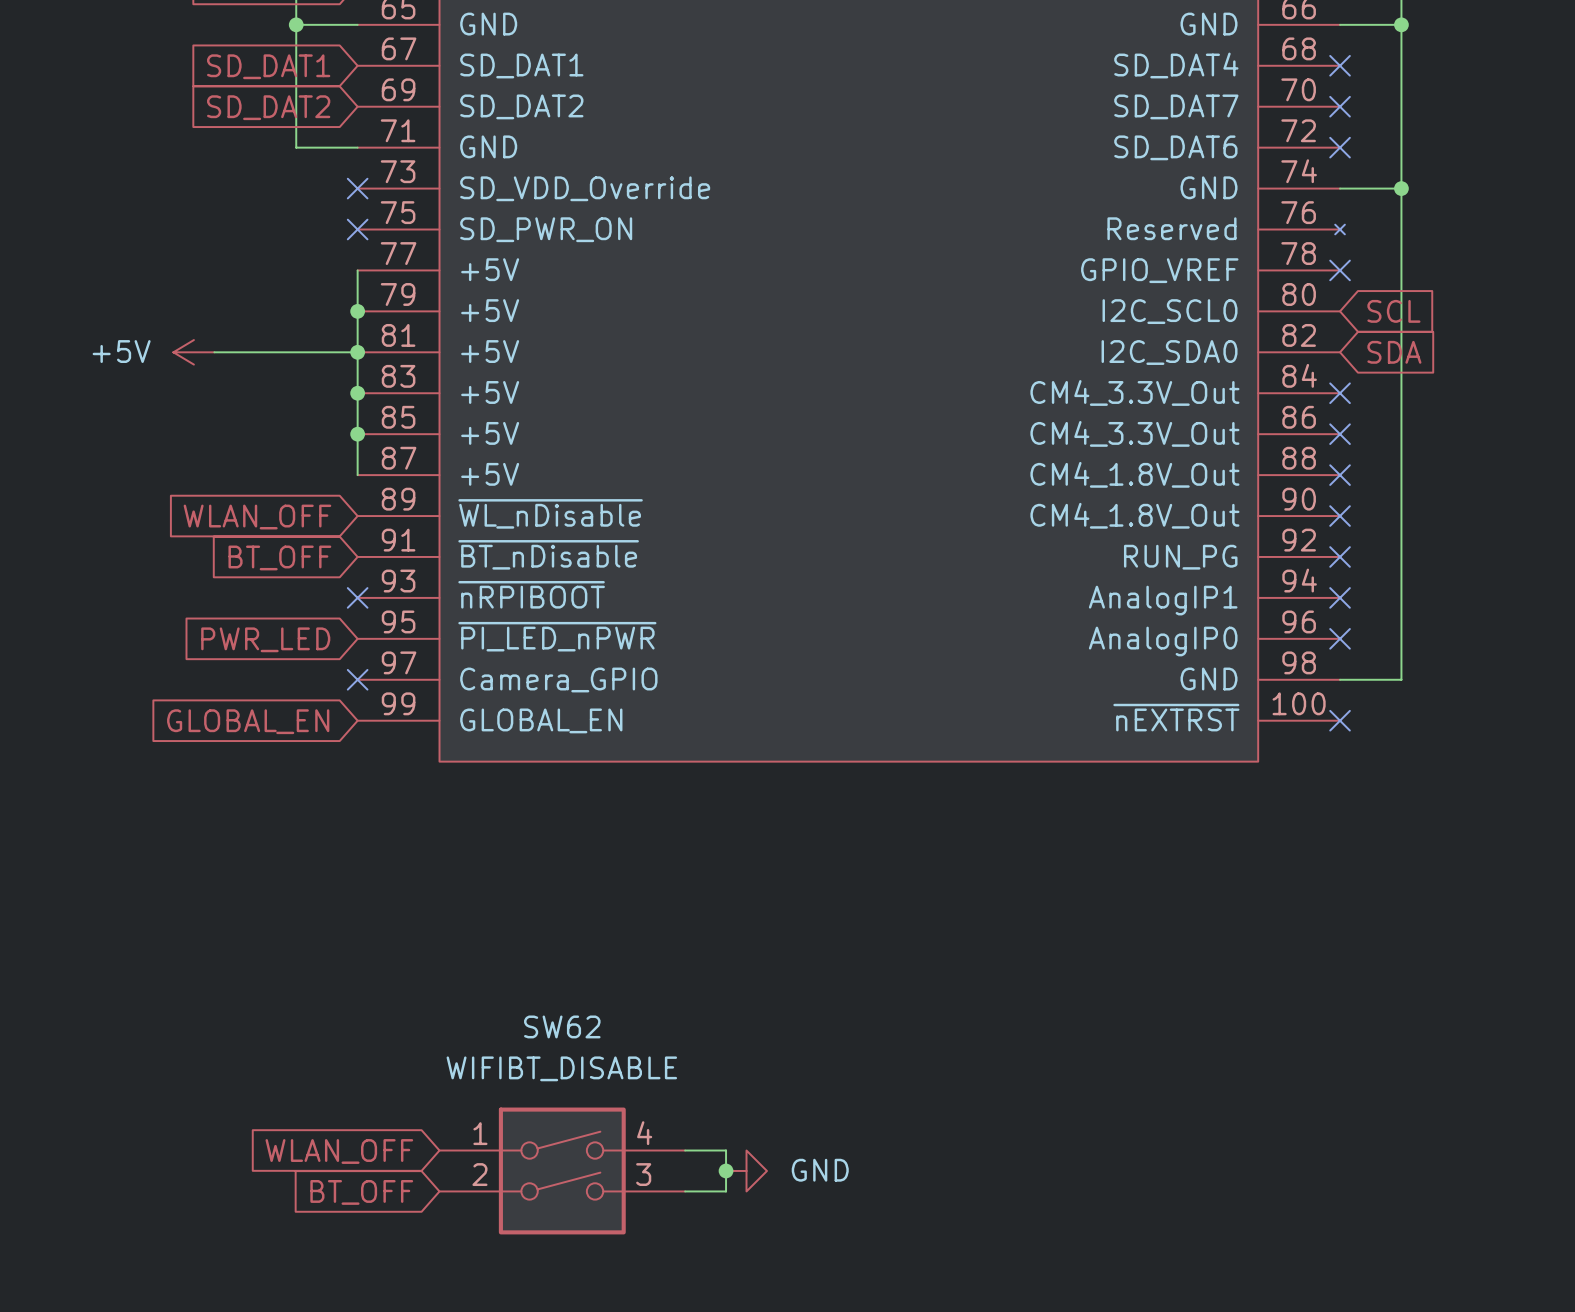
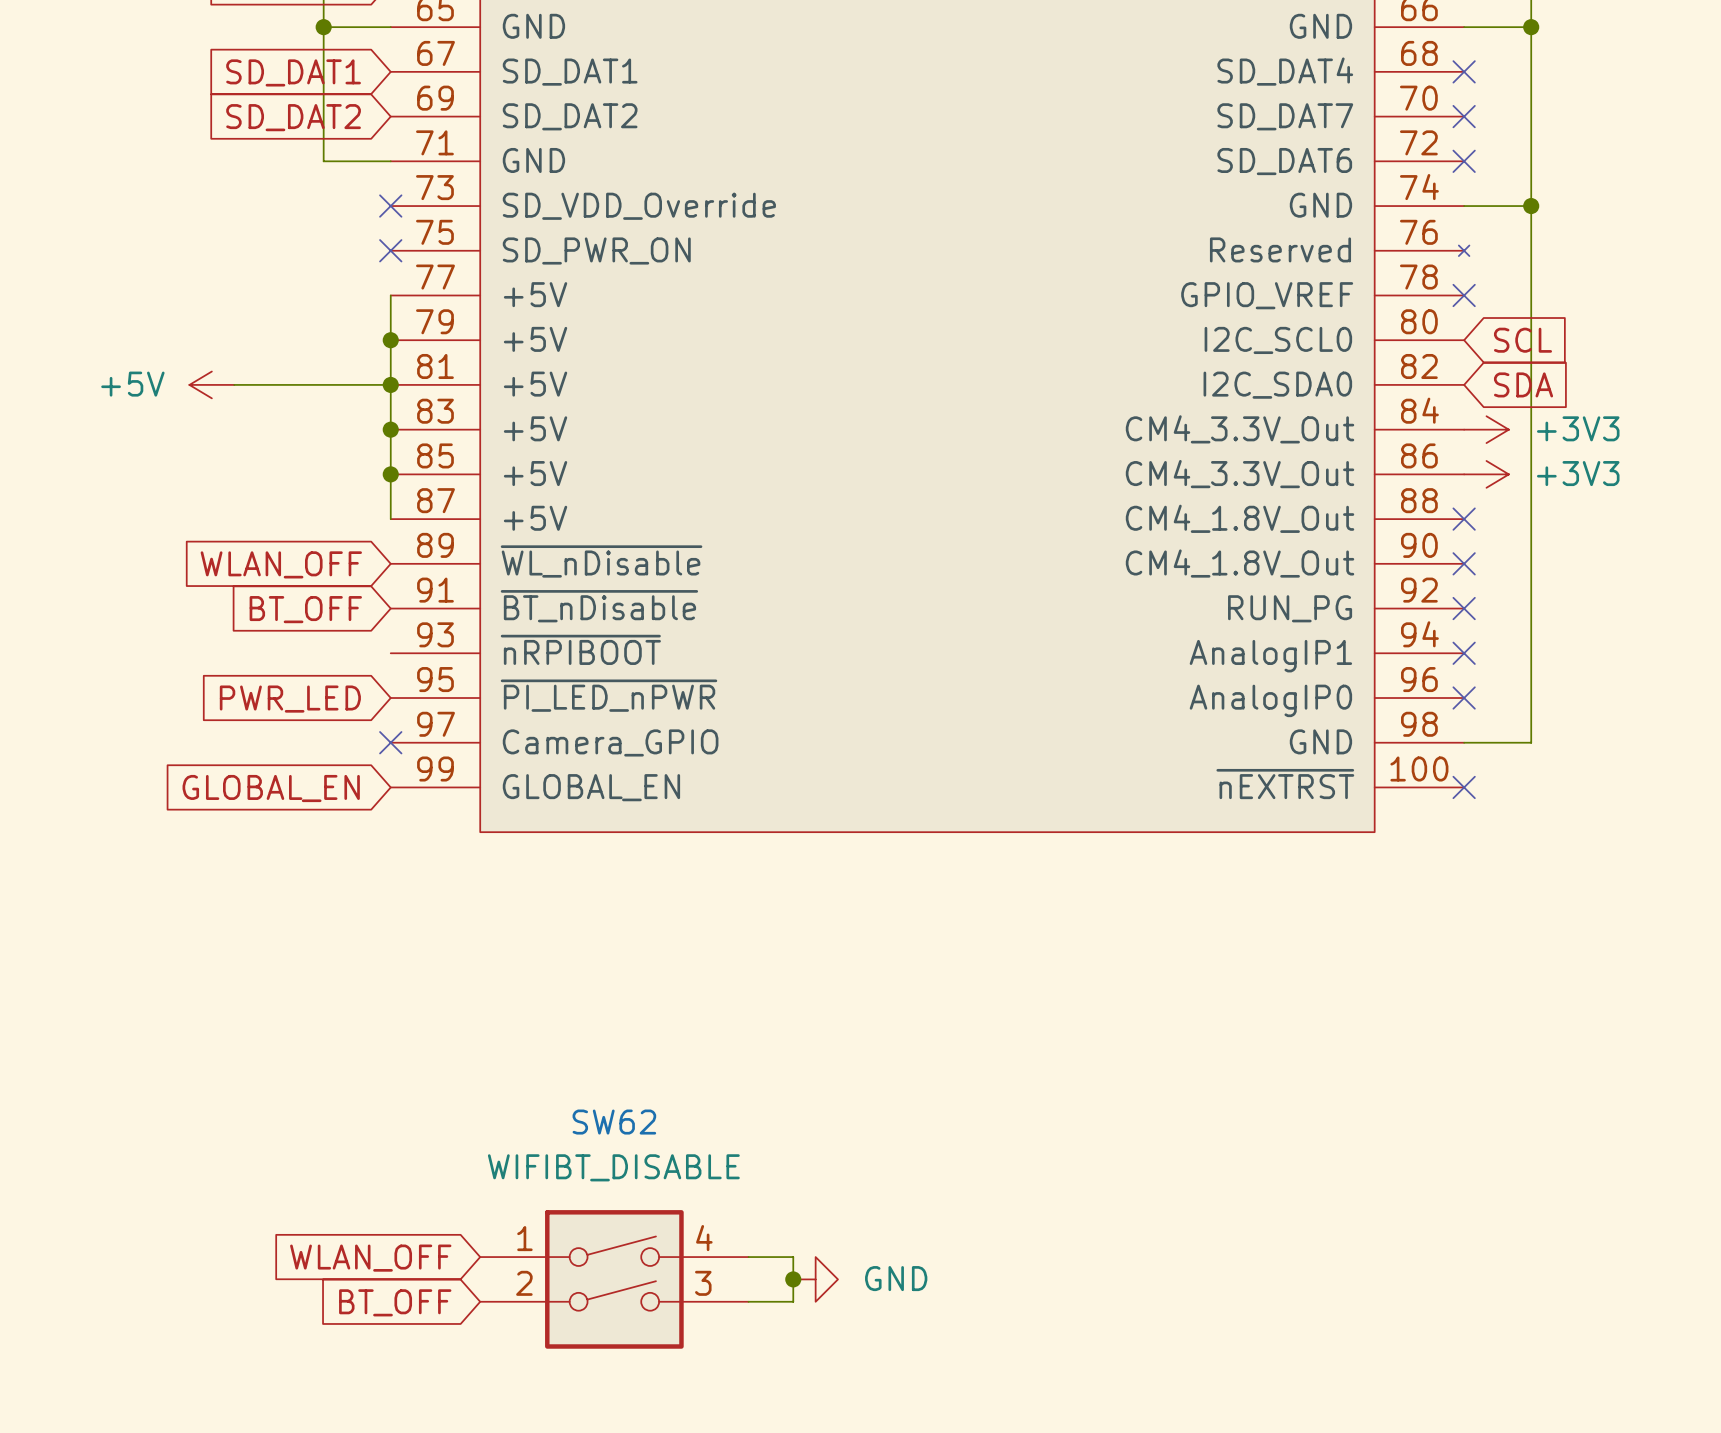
no-connect mark: (1340, 393) -> none
power symbol: none -> +3V3 (1486, 429)
no-connect mark: (1340, 434) -> none
power symbol: none -> +3V3 (1486, 474)
no-connect mark: (357, 597) -> none

